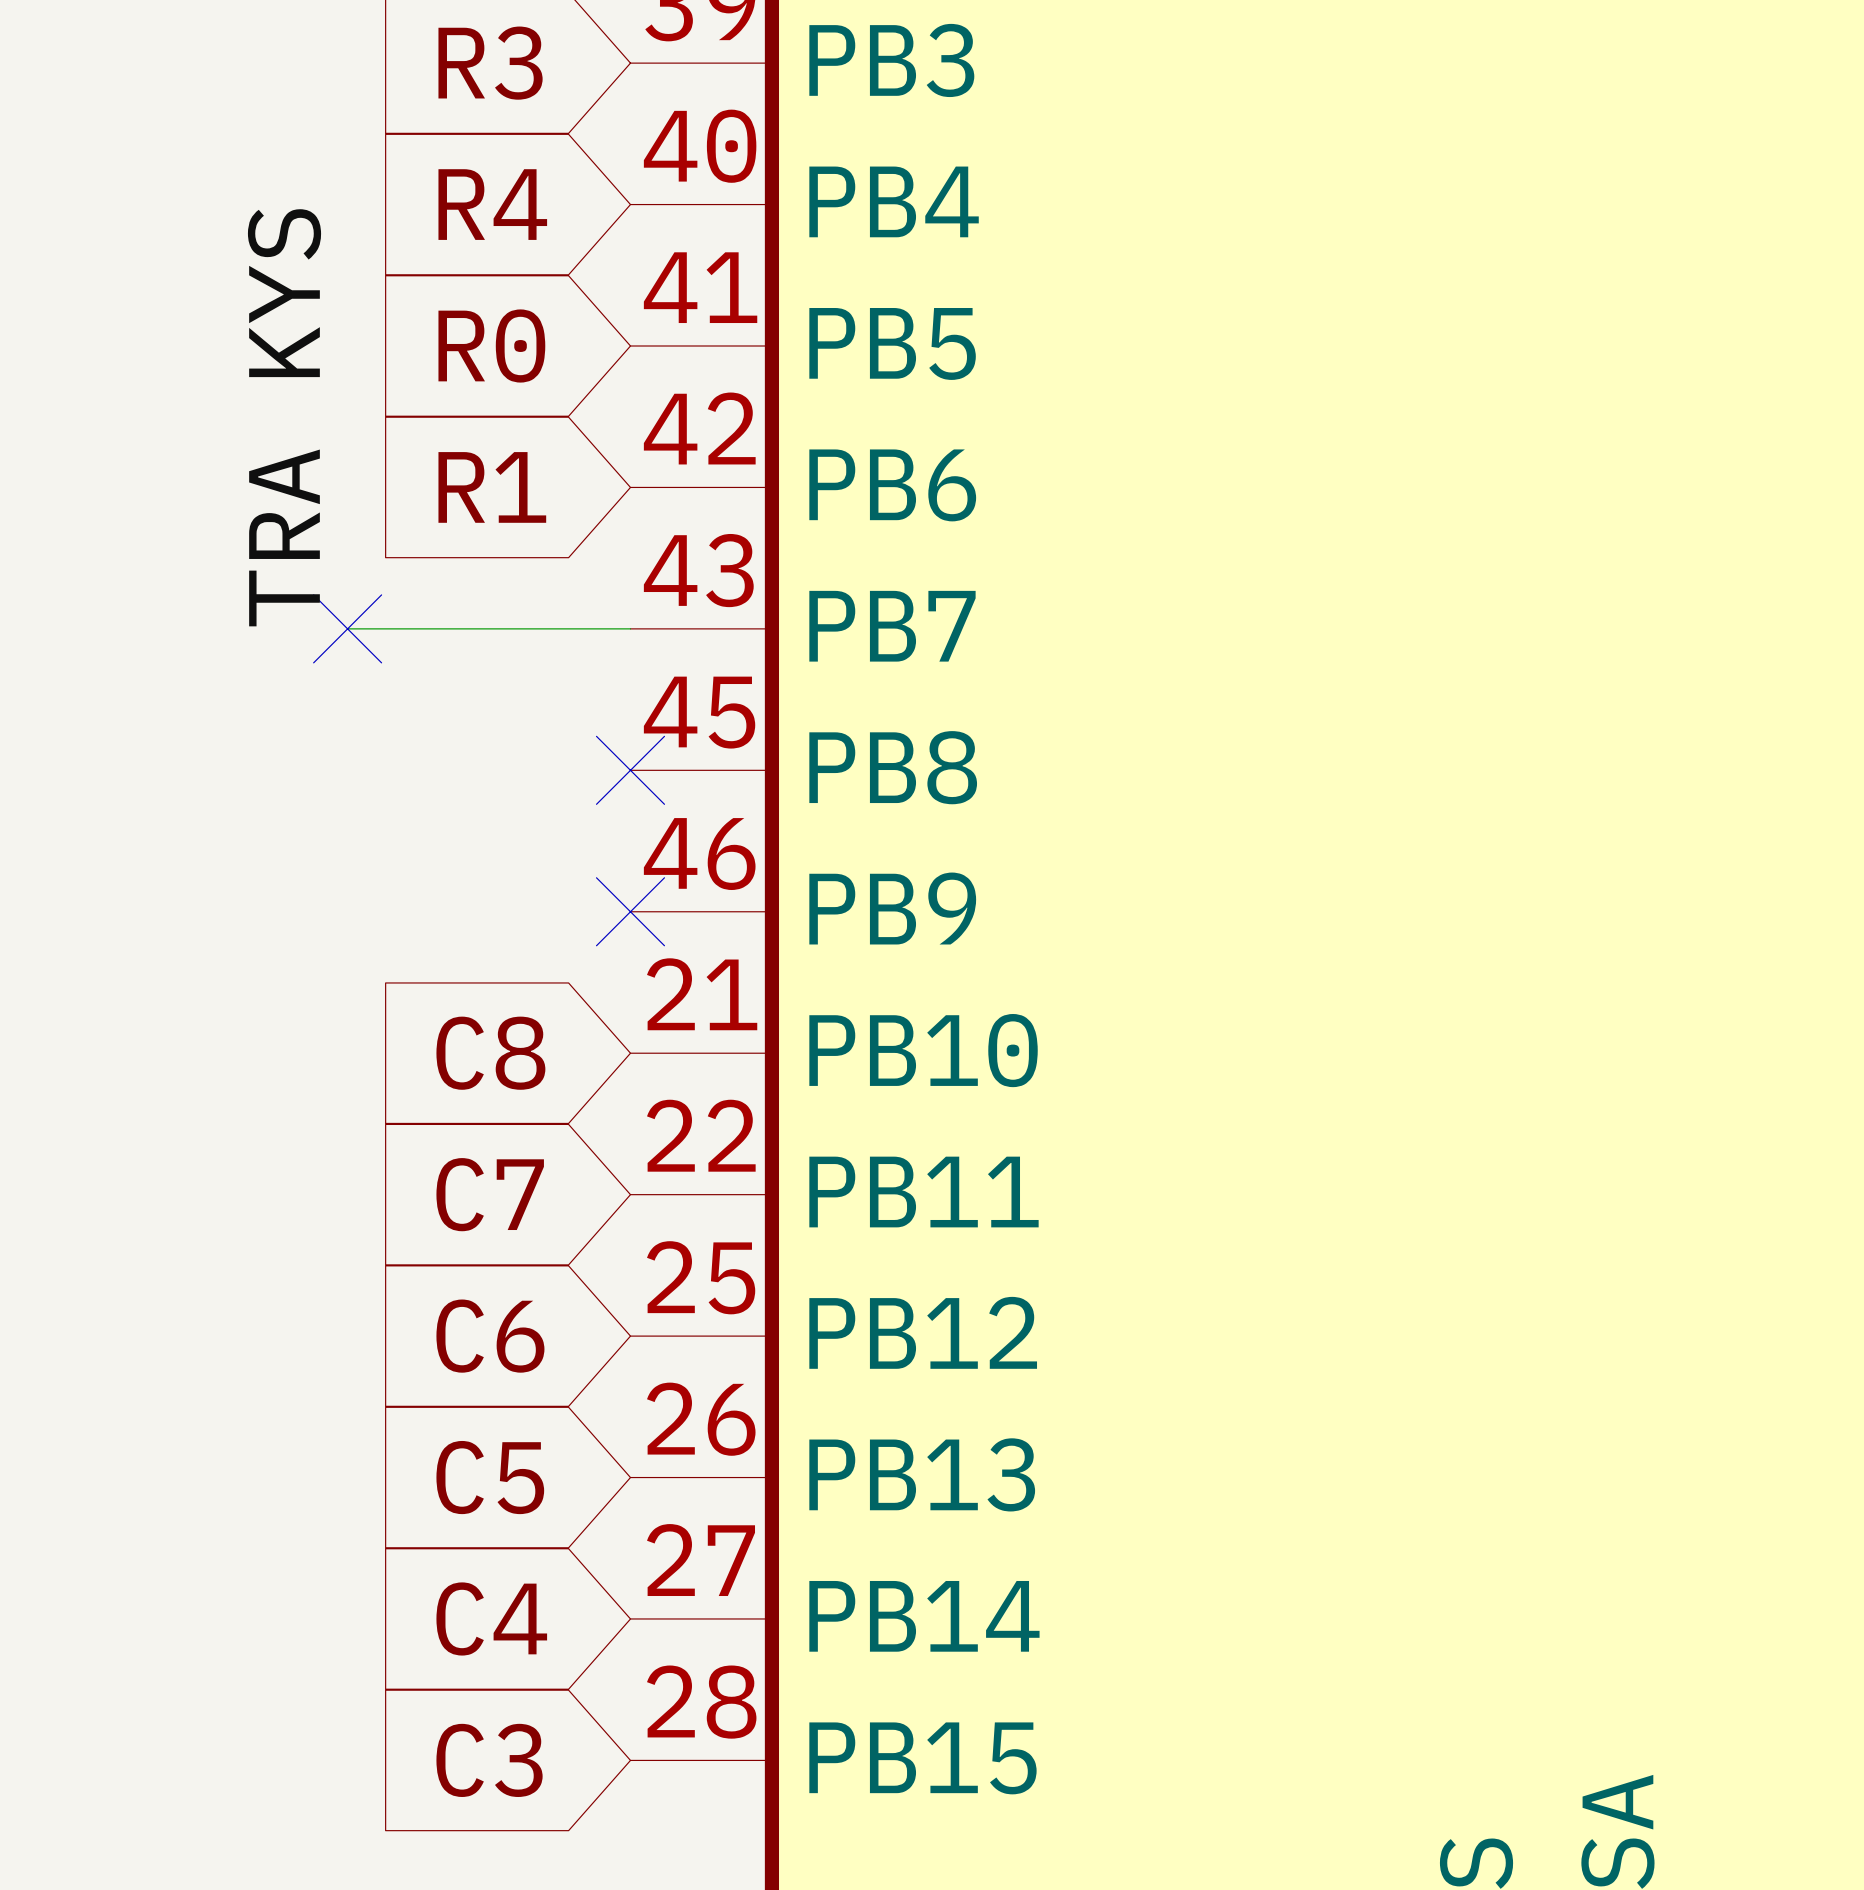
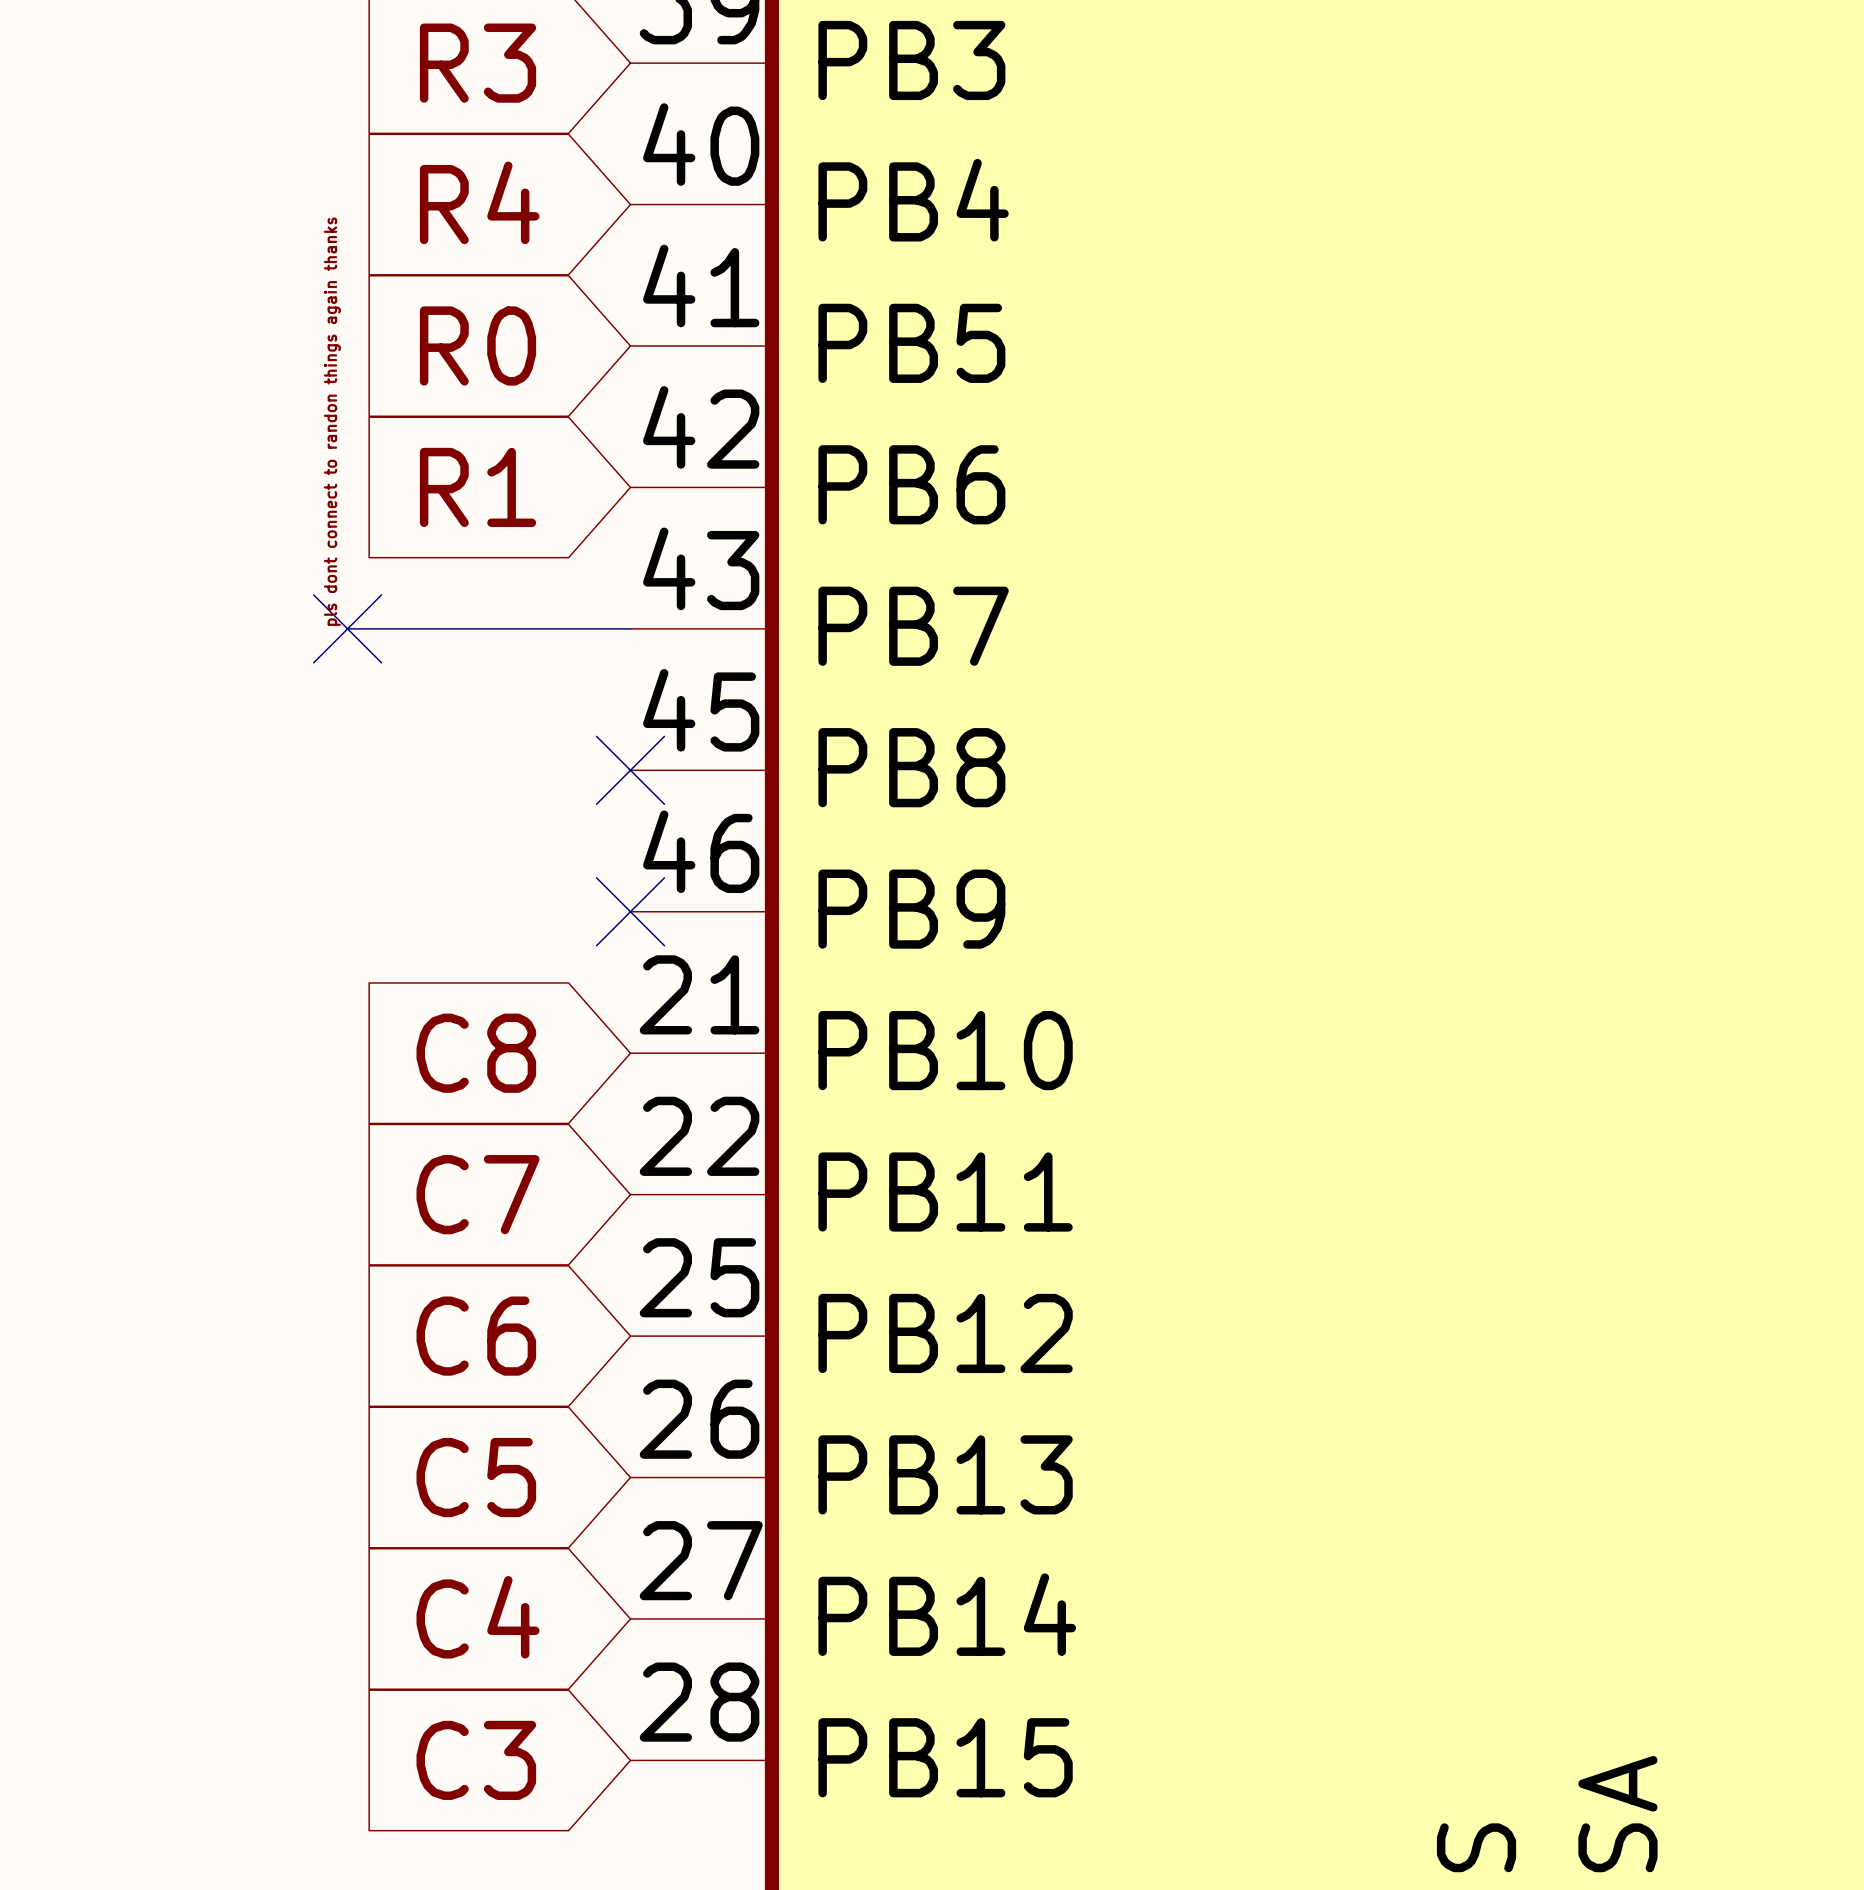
label: TRA KYS (284, 417) -> pls dont connect to randon things again thanks (332, 421)

